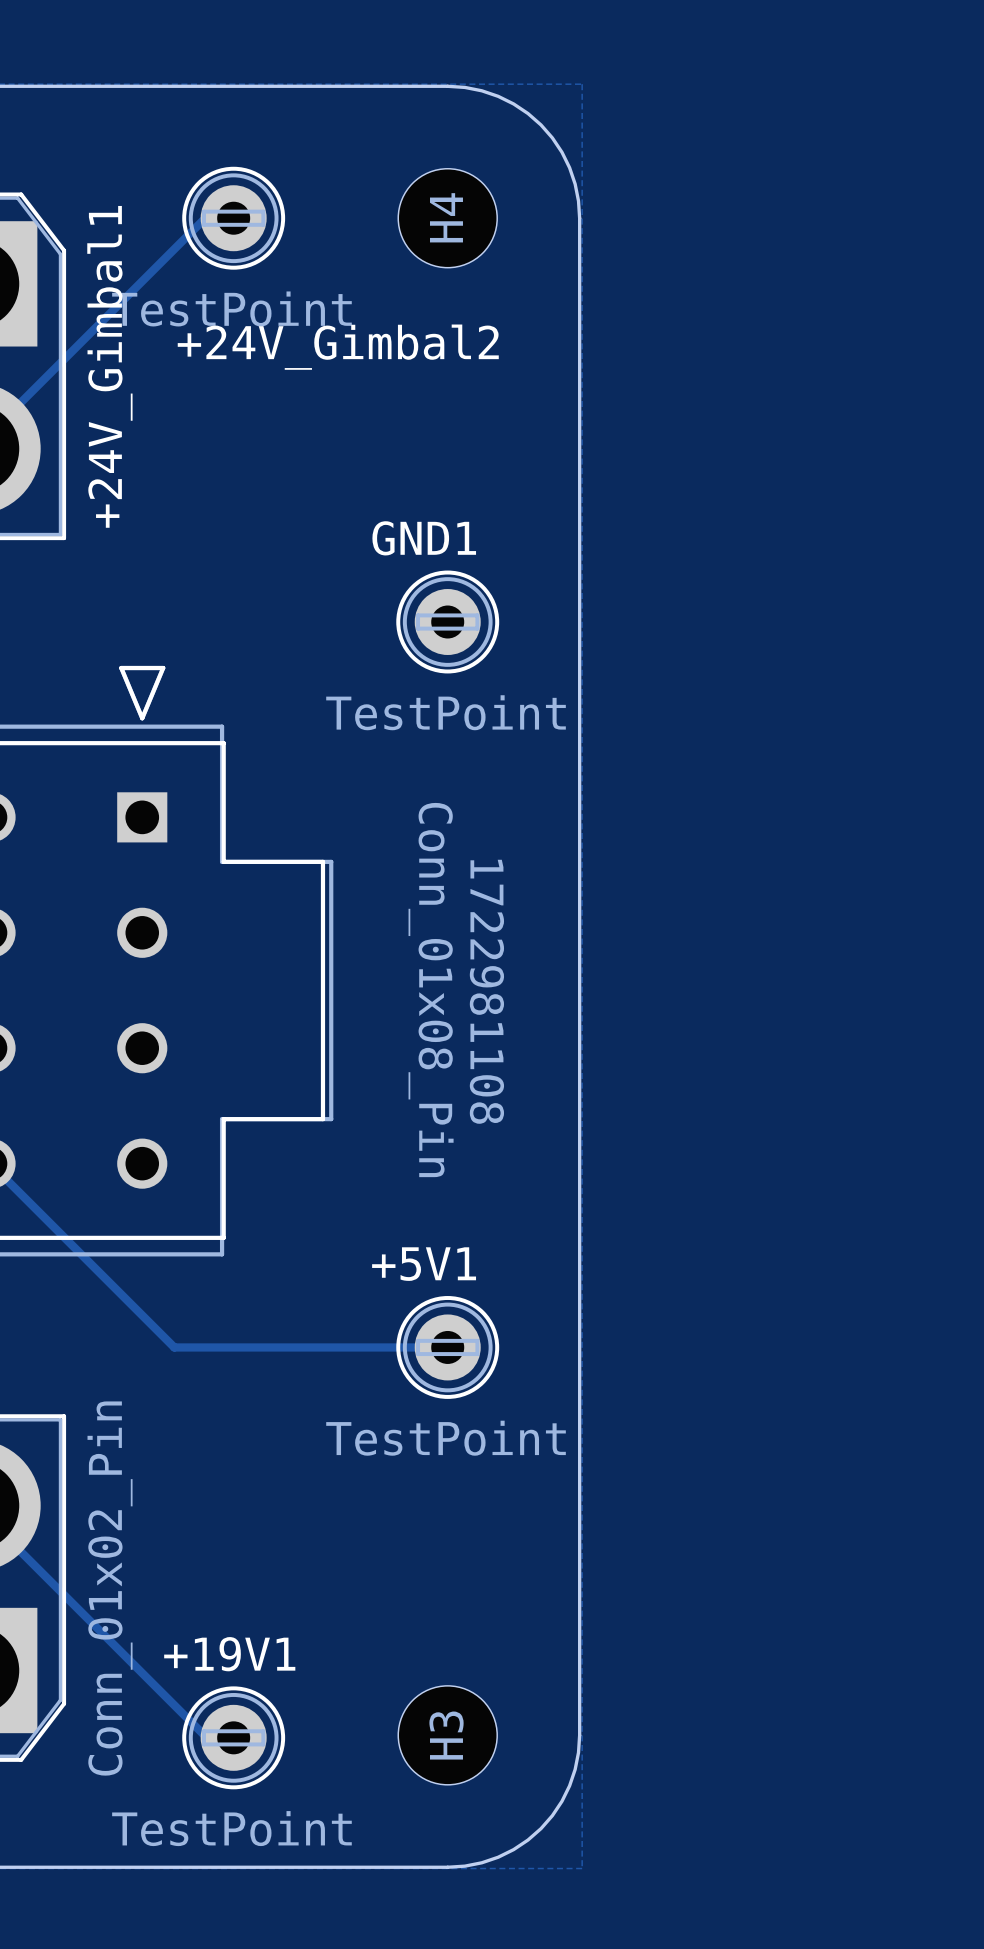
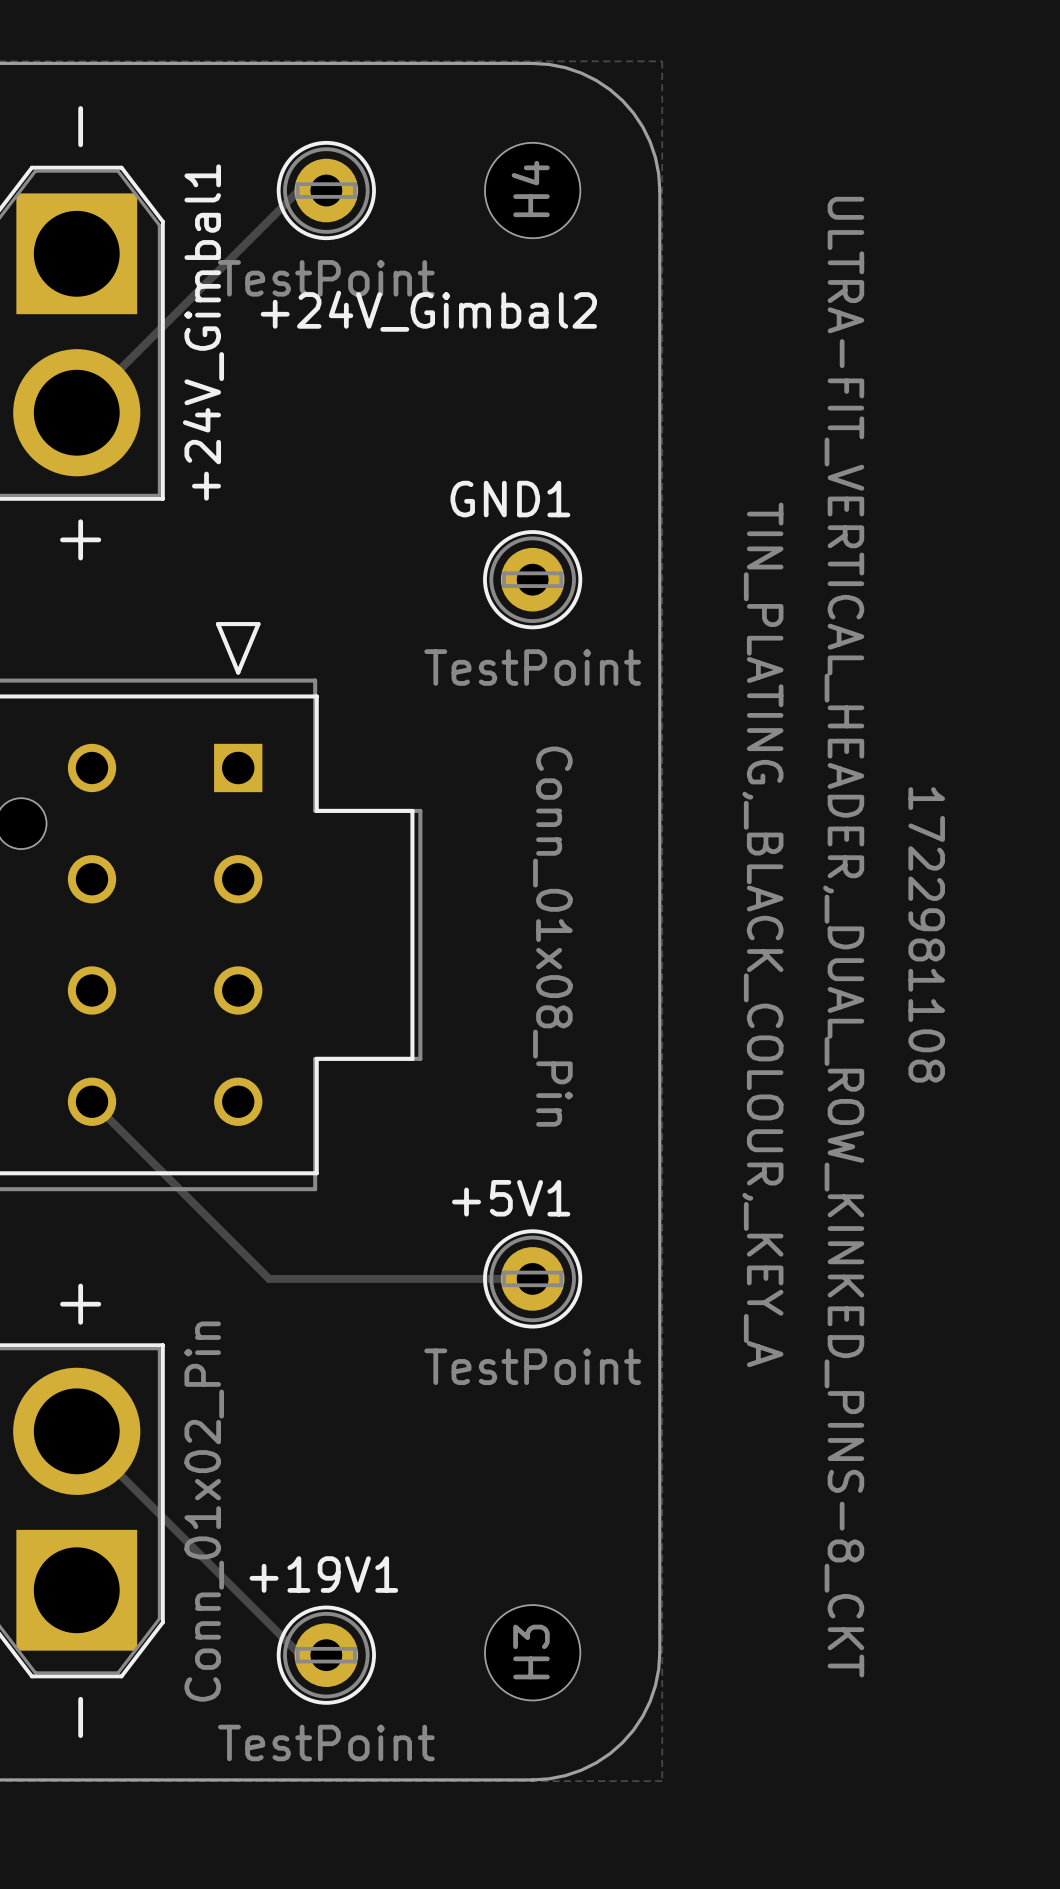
part value position: Conn_01x08_Pin (431, 990) -> Conn_01x08_Pin (552, 936)
part text: none -> TIN_PLATING,_BLACK_COLOUR,_KEY_A (762, 934)
part text position: 1722981108 (486, 991) -> 1722981108 (926, 934)
part text: none -> ULTRA-FIT_VERTICAL_HEADER,_DUAL_ROW_KINKED_PINS-8_CKT (843, 937)

